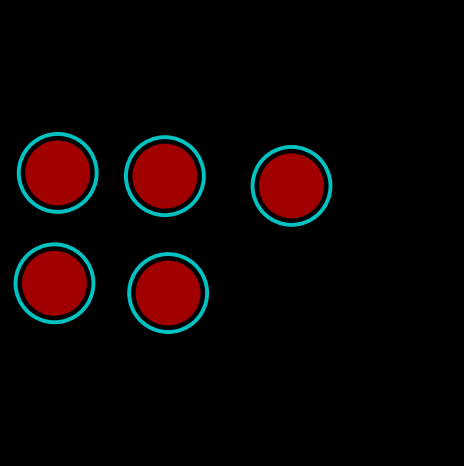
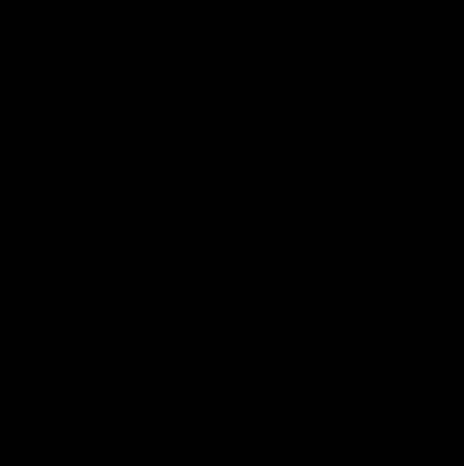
part: (57, 172) -> none
part: (164, 176) -> none
part: (291, 185) -> none
part: (54, 283) -> none
part: (168, 293) -> none

